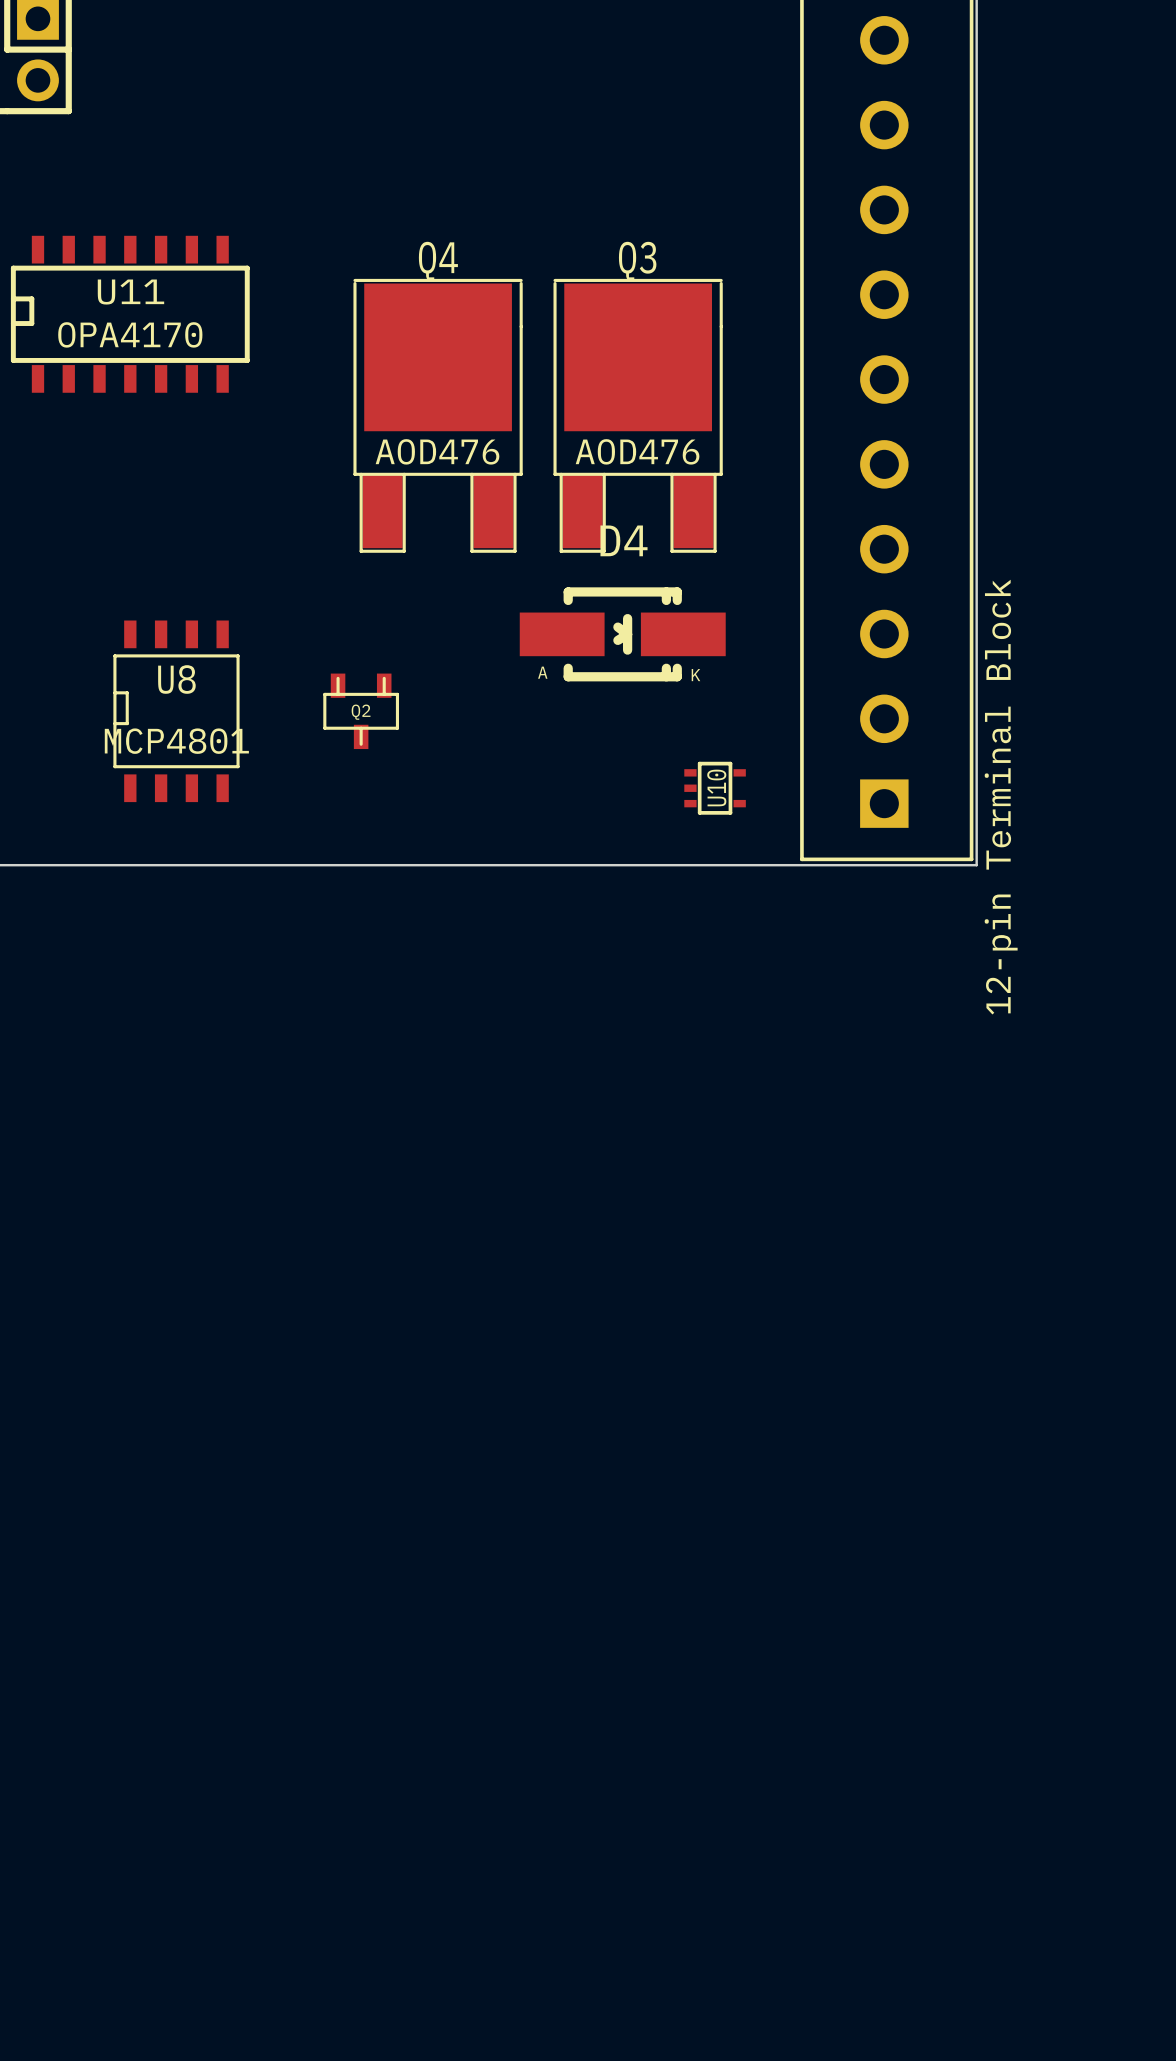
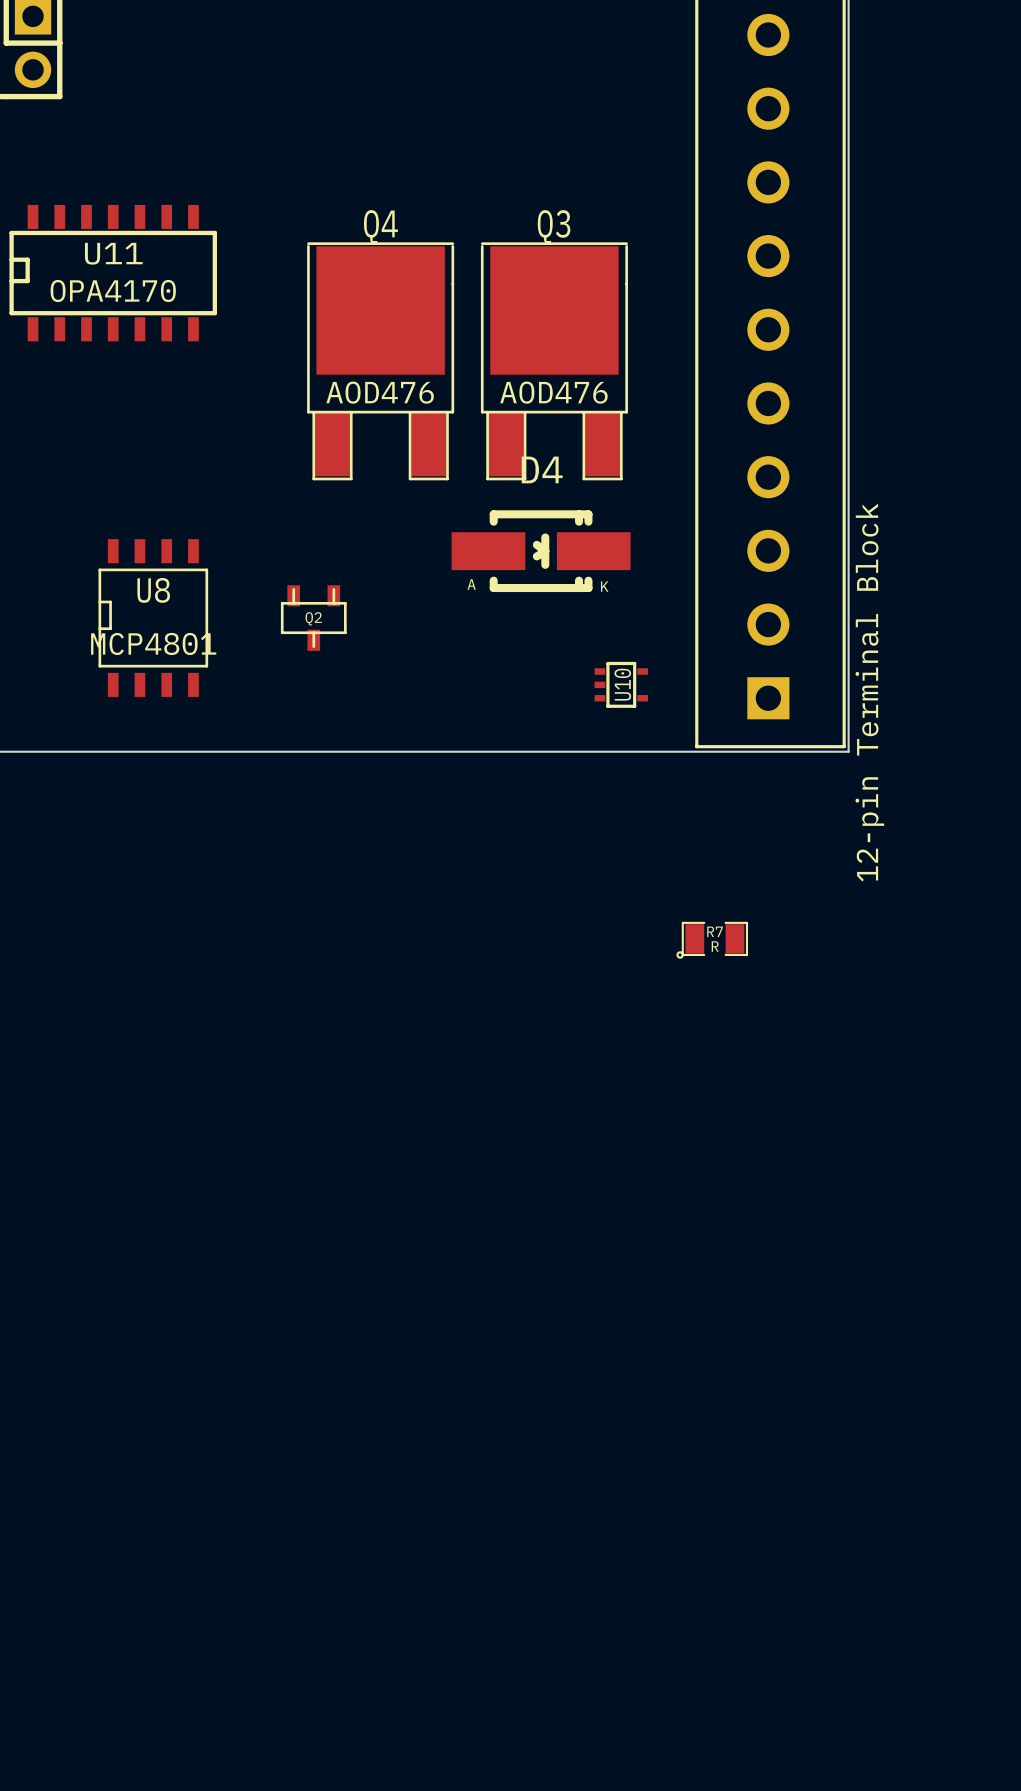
R7: none -> R (712, 940)

